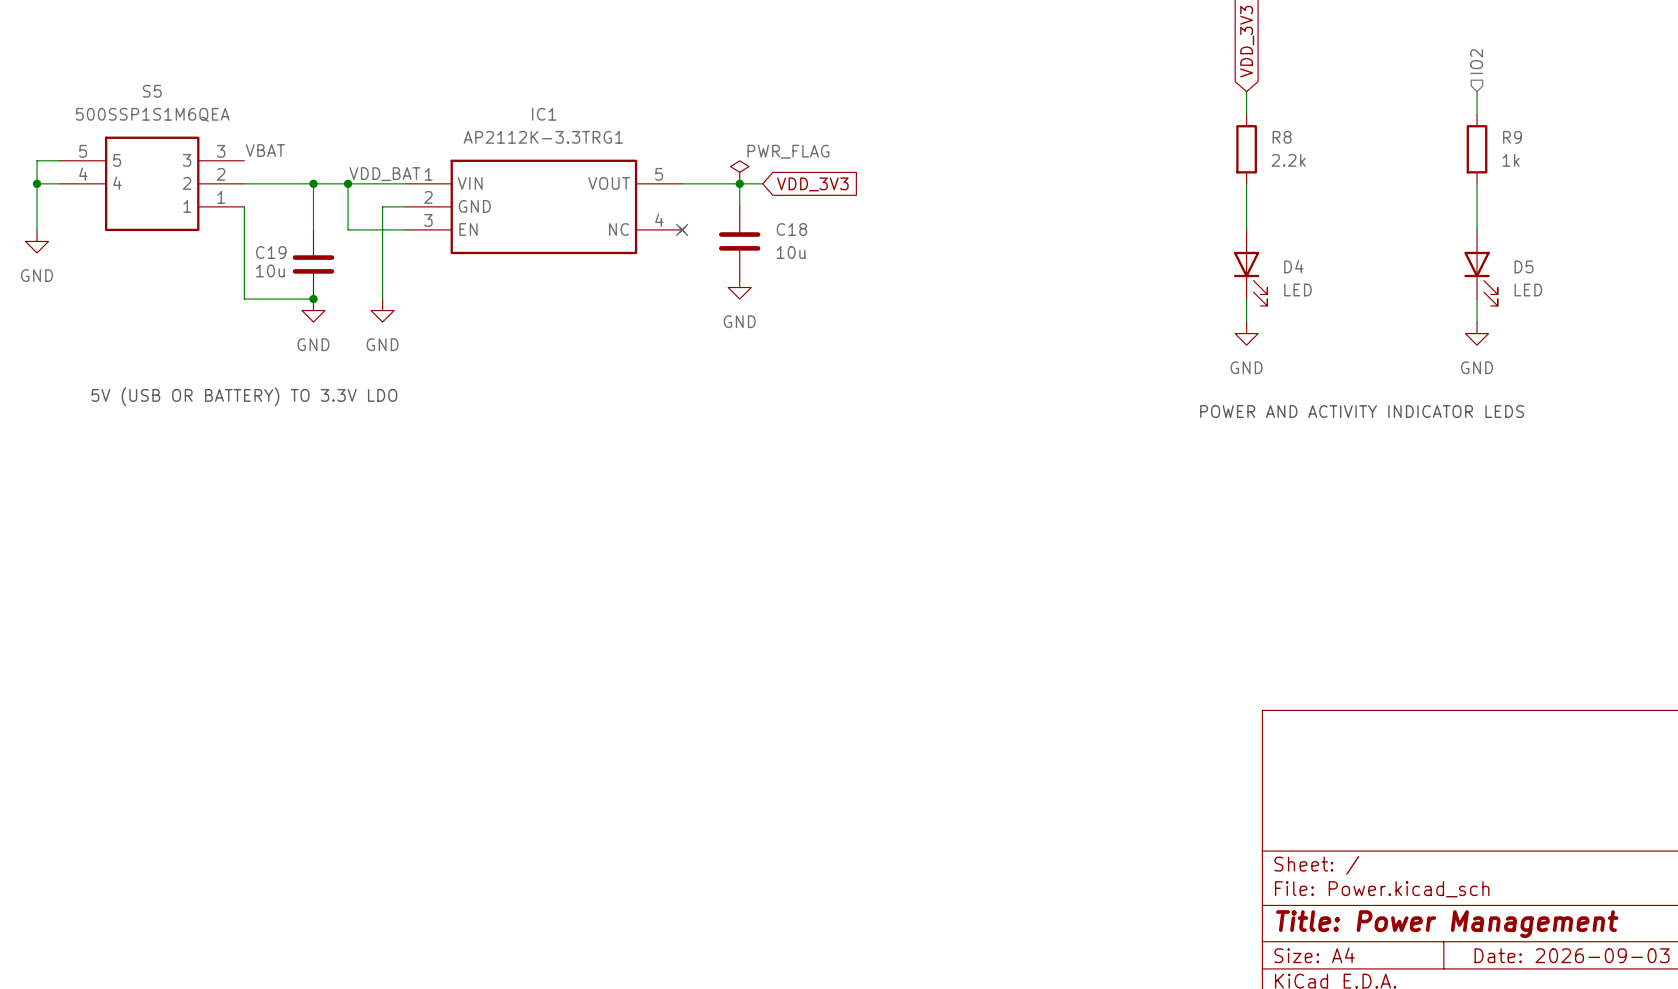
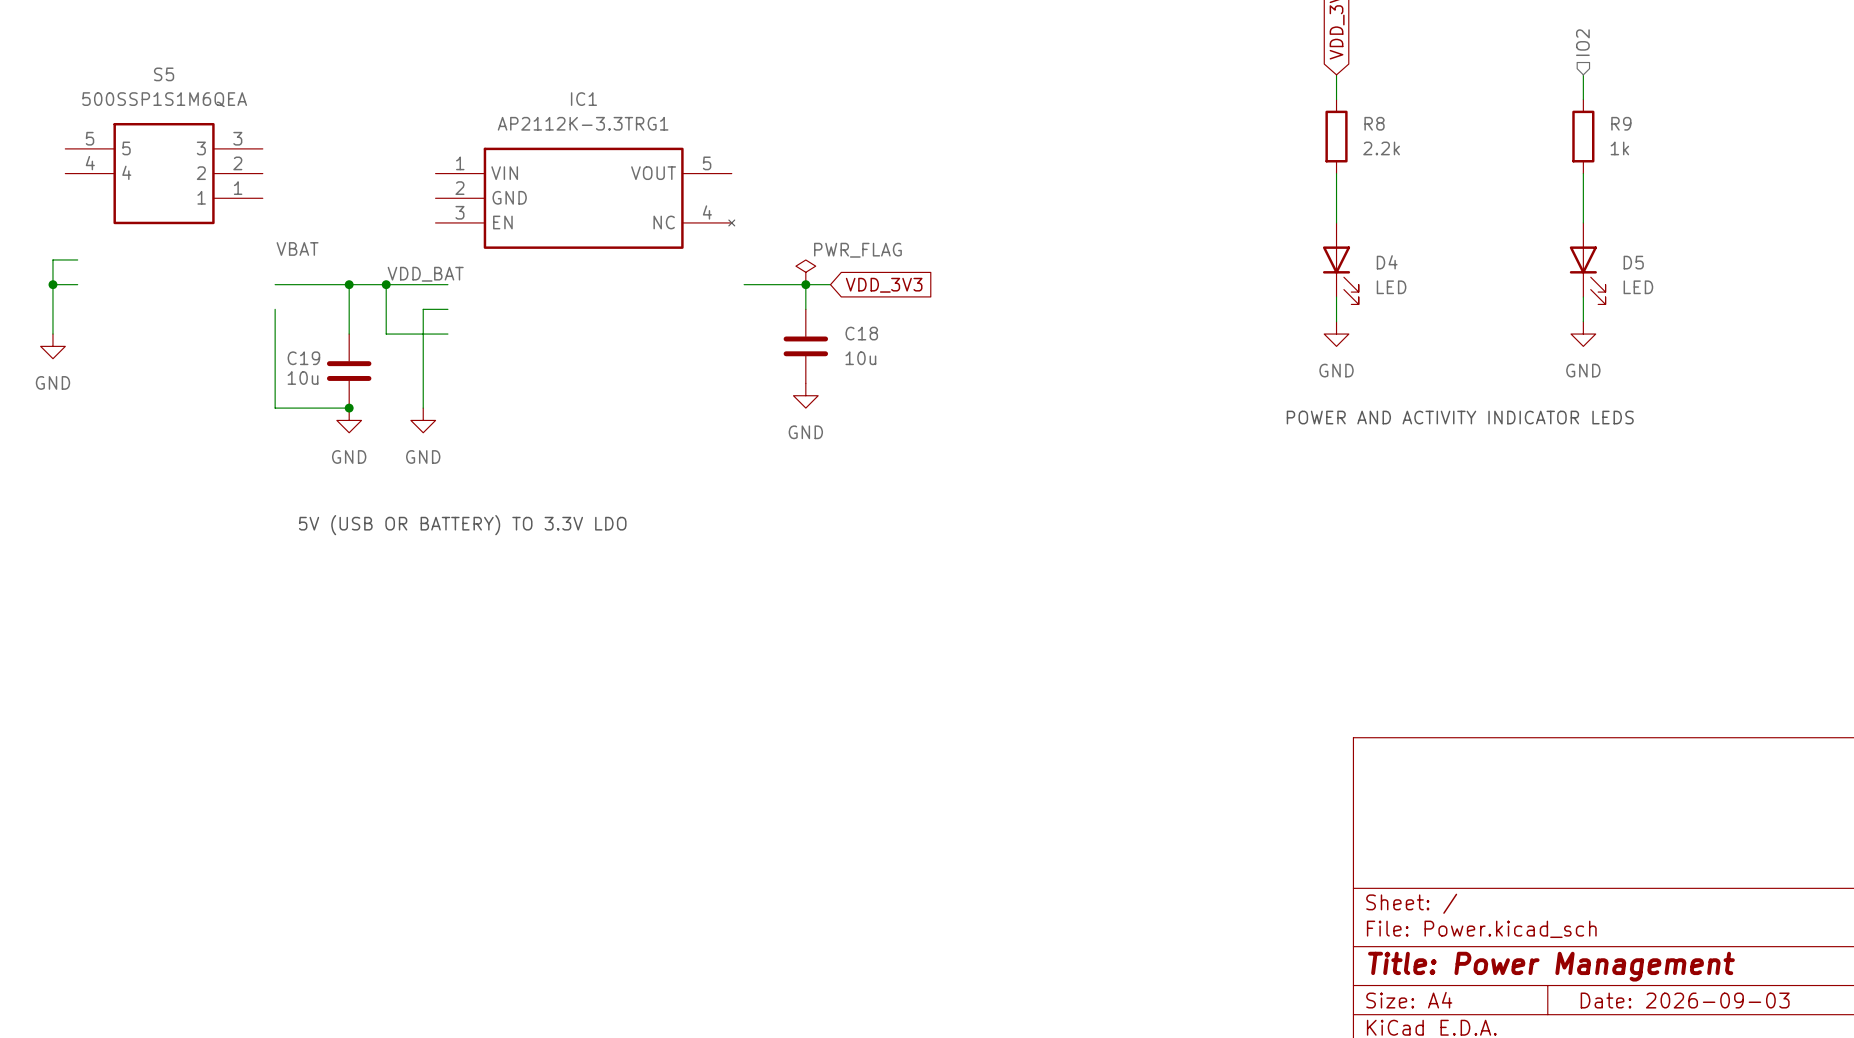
label position: VBAT (265, 150) -> VBAT (297, 248)
wire: (60, 160) (37, 160) (37, 229) -> (77, 259) (52, 259) (52, 334)
power symbol position: PWR_FLAG (739, 172) -> PWR_FLAG (805, 272)
label position: VDD_BAT (384, 174) -> VDD_BAT (425, 274)
wire: (37, 183) (60, 183) -> (52, 284) (77, 284)
junction: (37, 183) -> none
wire: (244, 183) (405, 183) -> (275, 284) (447, 284)
wire: (313, 183) (313, 229) -> (349, 284) (349, 334)
junction: (313, 183) -> none
wire: (348, 183) (348, 229) (405, 229) -> (386, 284) (386, 334) (447, 334)
junction: (348, 183) -> none
wire: (682, 183) (762, 183) -> (744, 284) (830, 284)
wire: (739, 183) (739, 206) -> (805, 284) (805, 309)
junction: (739, 183) -> none
global label position: VDD_3V3 (812, 184) -> VDD_3V3 (884, 285)
wire: (244, 206) (244, 299) (313, 299) -> (275, 309) (275, 408) (349, 408)
wire: (405, 206) (382, 206) (382, 299) -> (447, 309) (423, 309) (423, 408)
no-connect mark: (682, 229) -> none
power symbol position: GND (37, 241) -> GND (52, 346)
C18 position: (739, 241) -> (805, 346)
C19 position: (313, 264) -> (349, 371)
junction: none -> (52, 284)
junction: none -> (386, 284)
power symbol position: GND (739, 287) -> GND (805, 395)
junction: none -> (805, 284)
junction position: (313, 299) -> (349, 284)
power symbol: GND (313, 310) -> none
power symbol: GND (382, 310) -> none
text position: 5V (USB OR BATTERY) TO 3.3V LDO (244, 396) -> 5V (USB OR BATTERY) TO 3.3V LDO (462, 525)
junction: none -> (349, 408)
power symbol: none -> GND (349, 420)
power symbol: none -> GND (423, 420)

